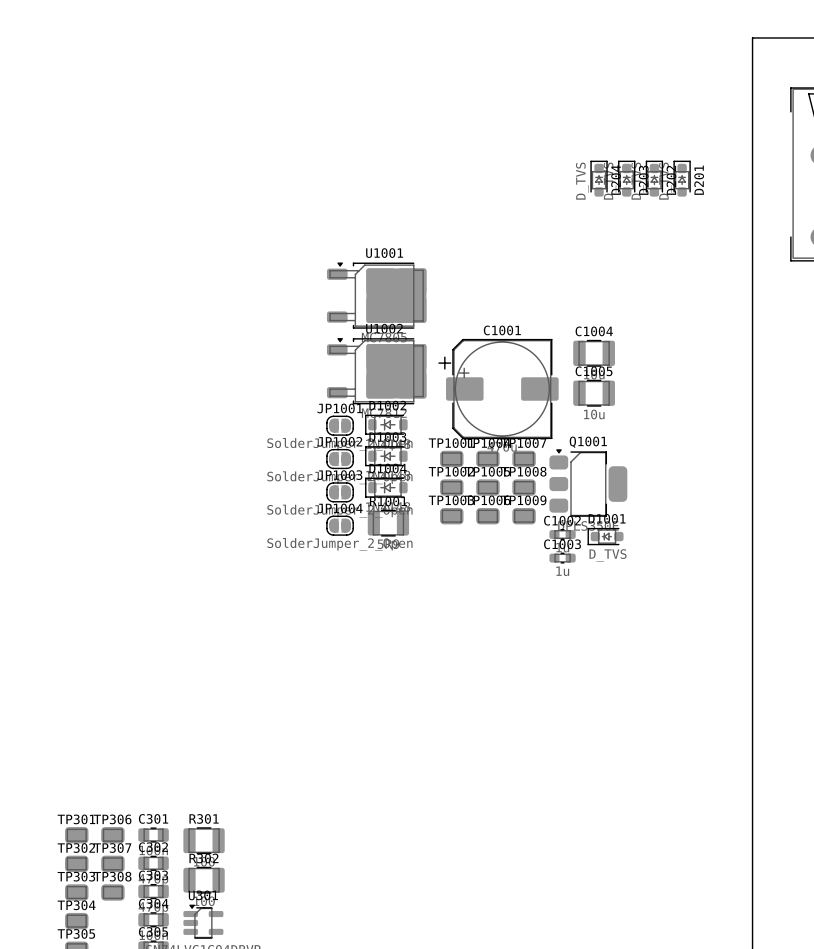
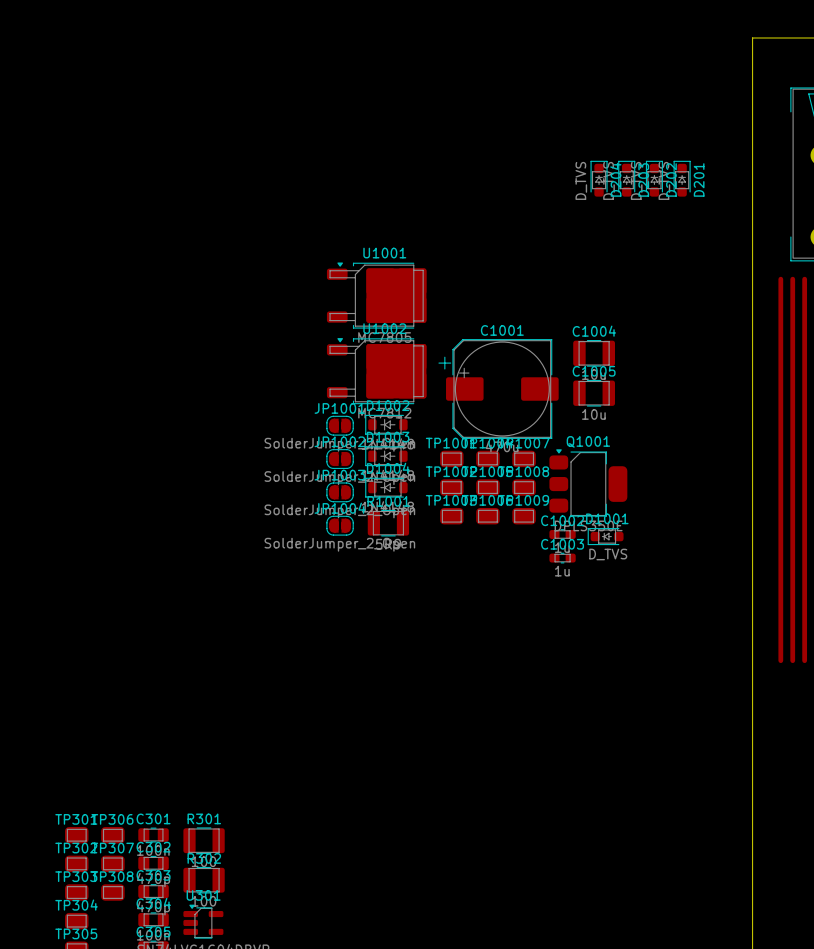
track: none -> (780, 279) (780, 660)
track: none -> (792, 279) (792, 660)
track: none -> (804, 279) (804, 660)

